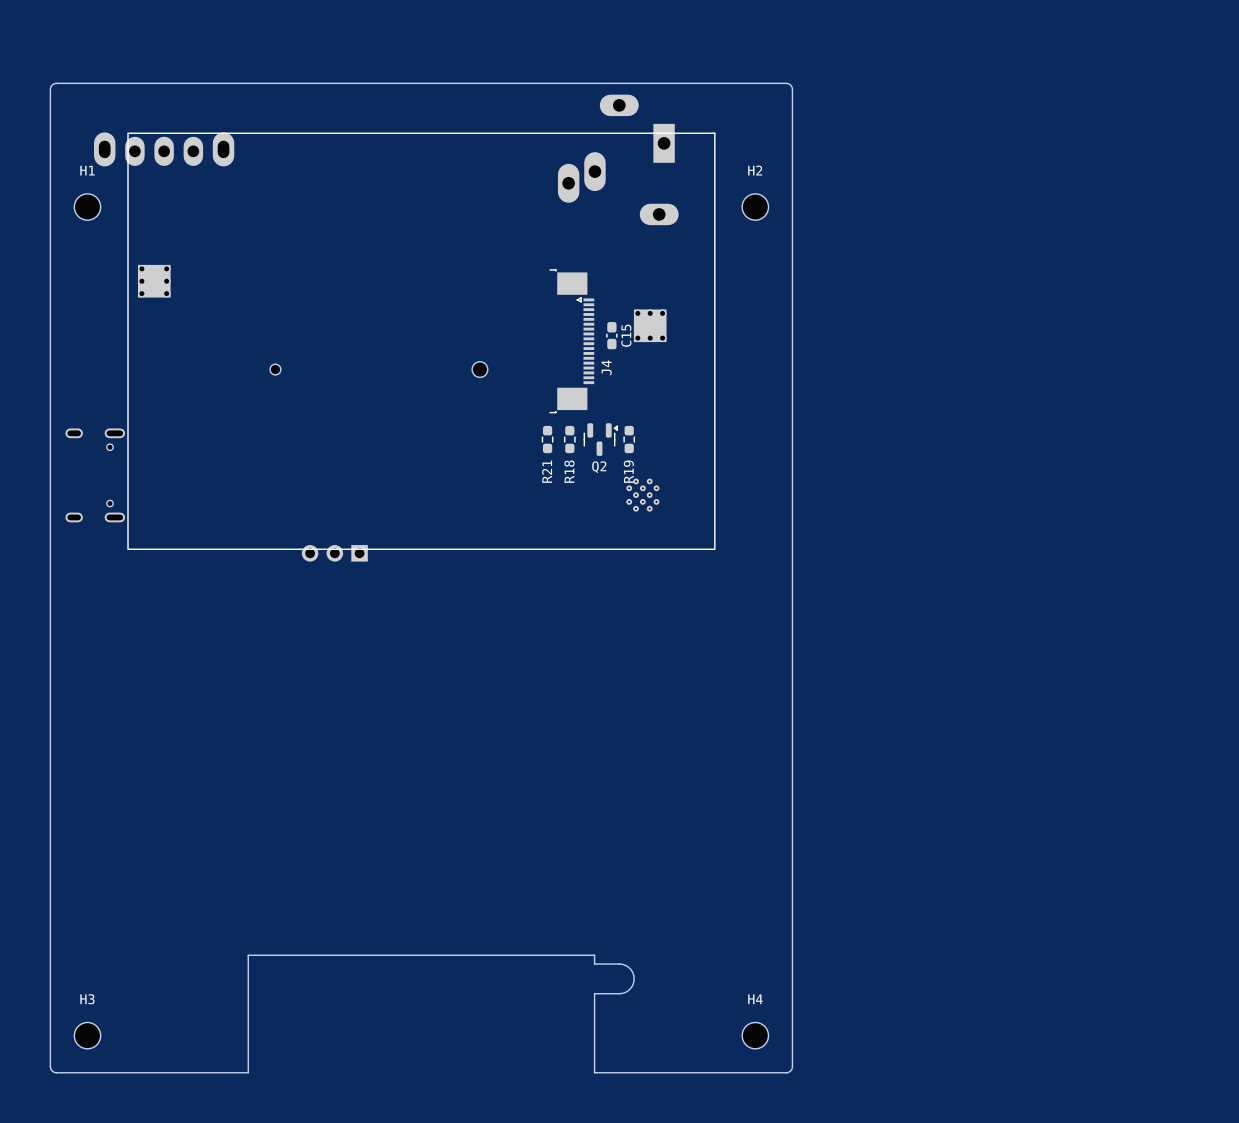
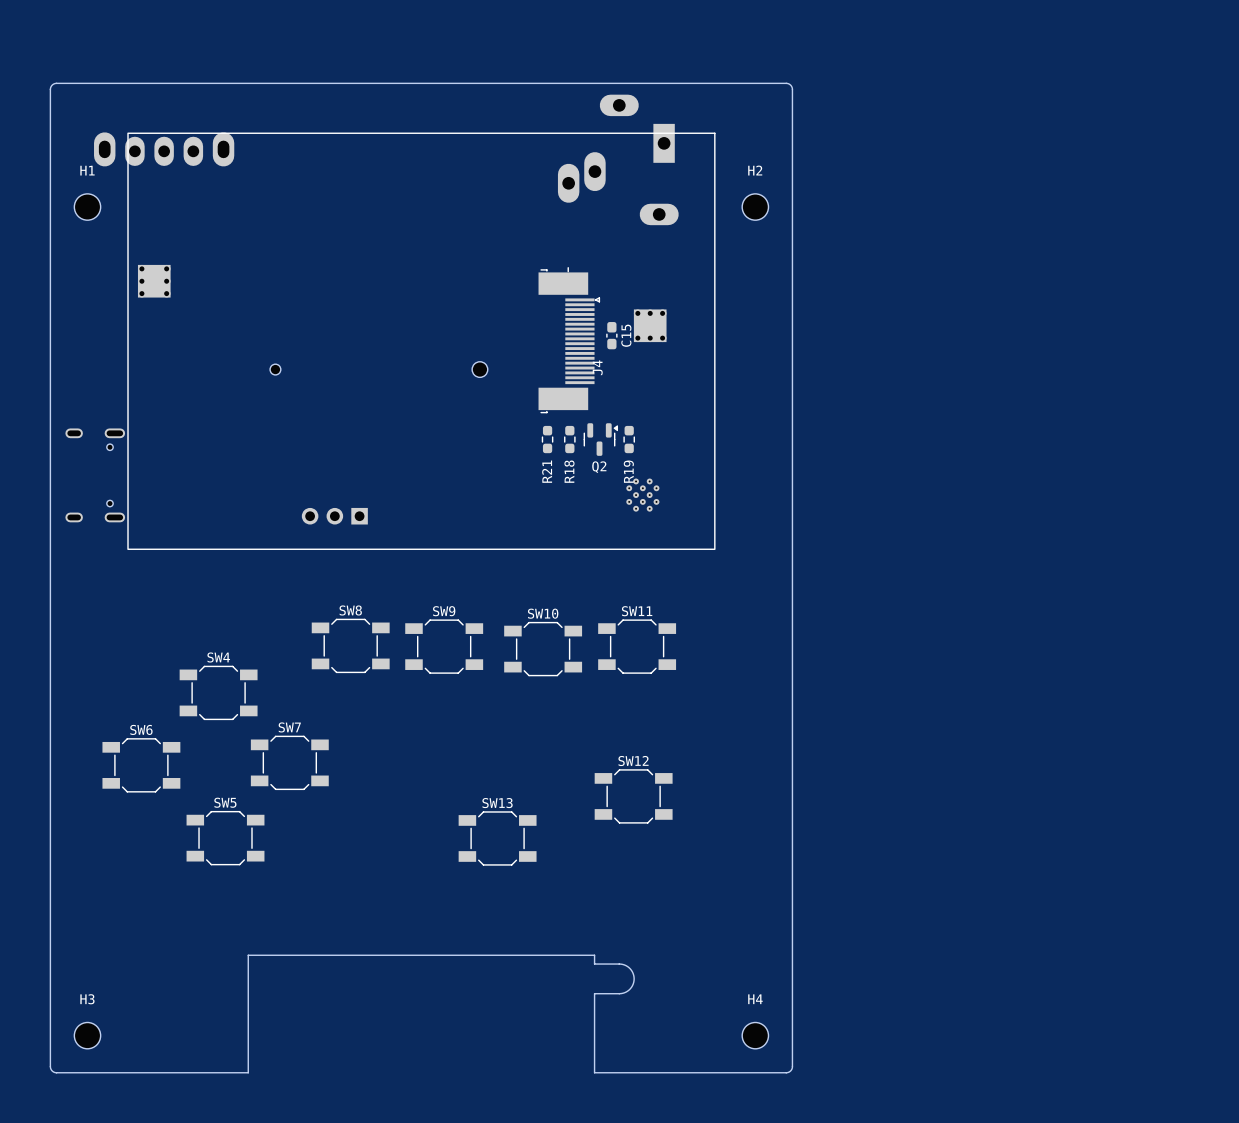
J4 footprint: [127, 132, 716, 550] -> [127, 132, 716, 550]
part position: (334, 553) -> (334, 516)
SW8: none -> (350, 645)
SW9: none -> (444, 646)
SW11: none -> (637, 646)
SW10: none -> (543, 649)
SW4: none -> (218, 692)
SW7: none -> (289, 762)
SW6: none -> (141, 765)
SW12: none -> (633, 796)
SW5: none -> (225, 838)
SW13: none -> (497, 838)

